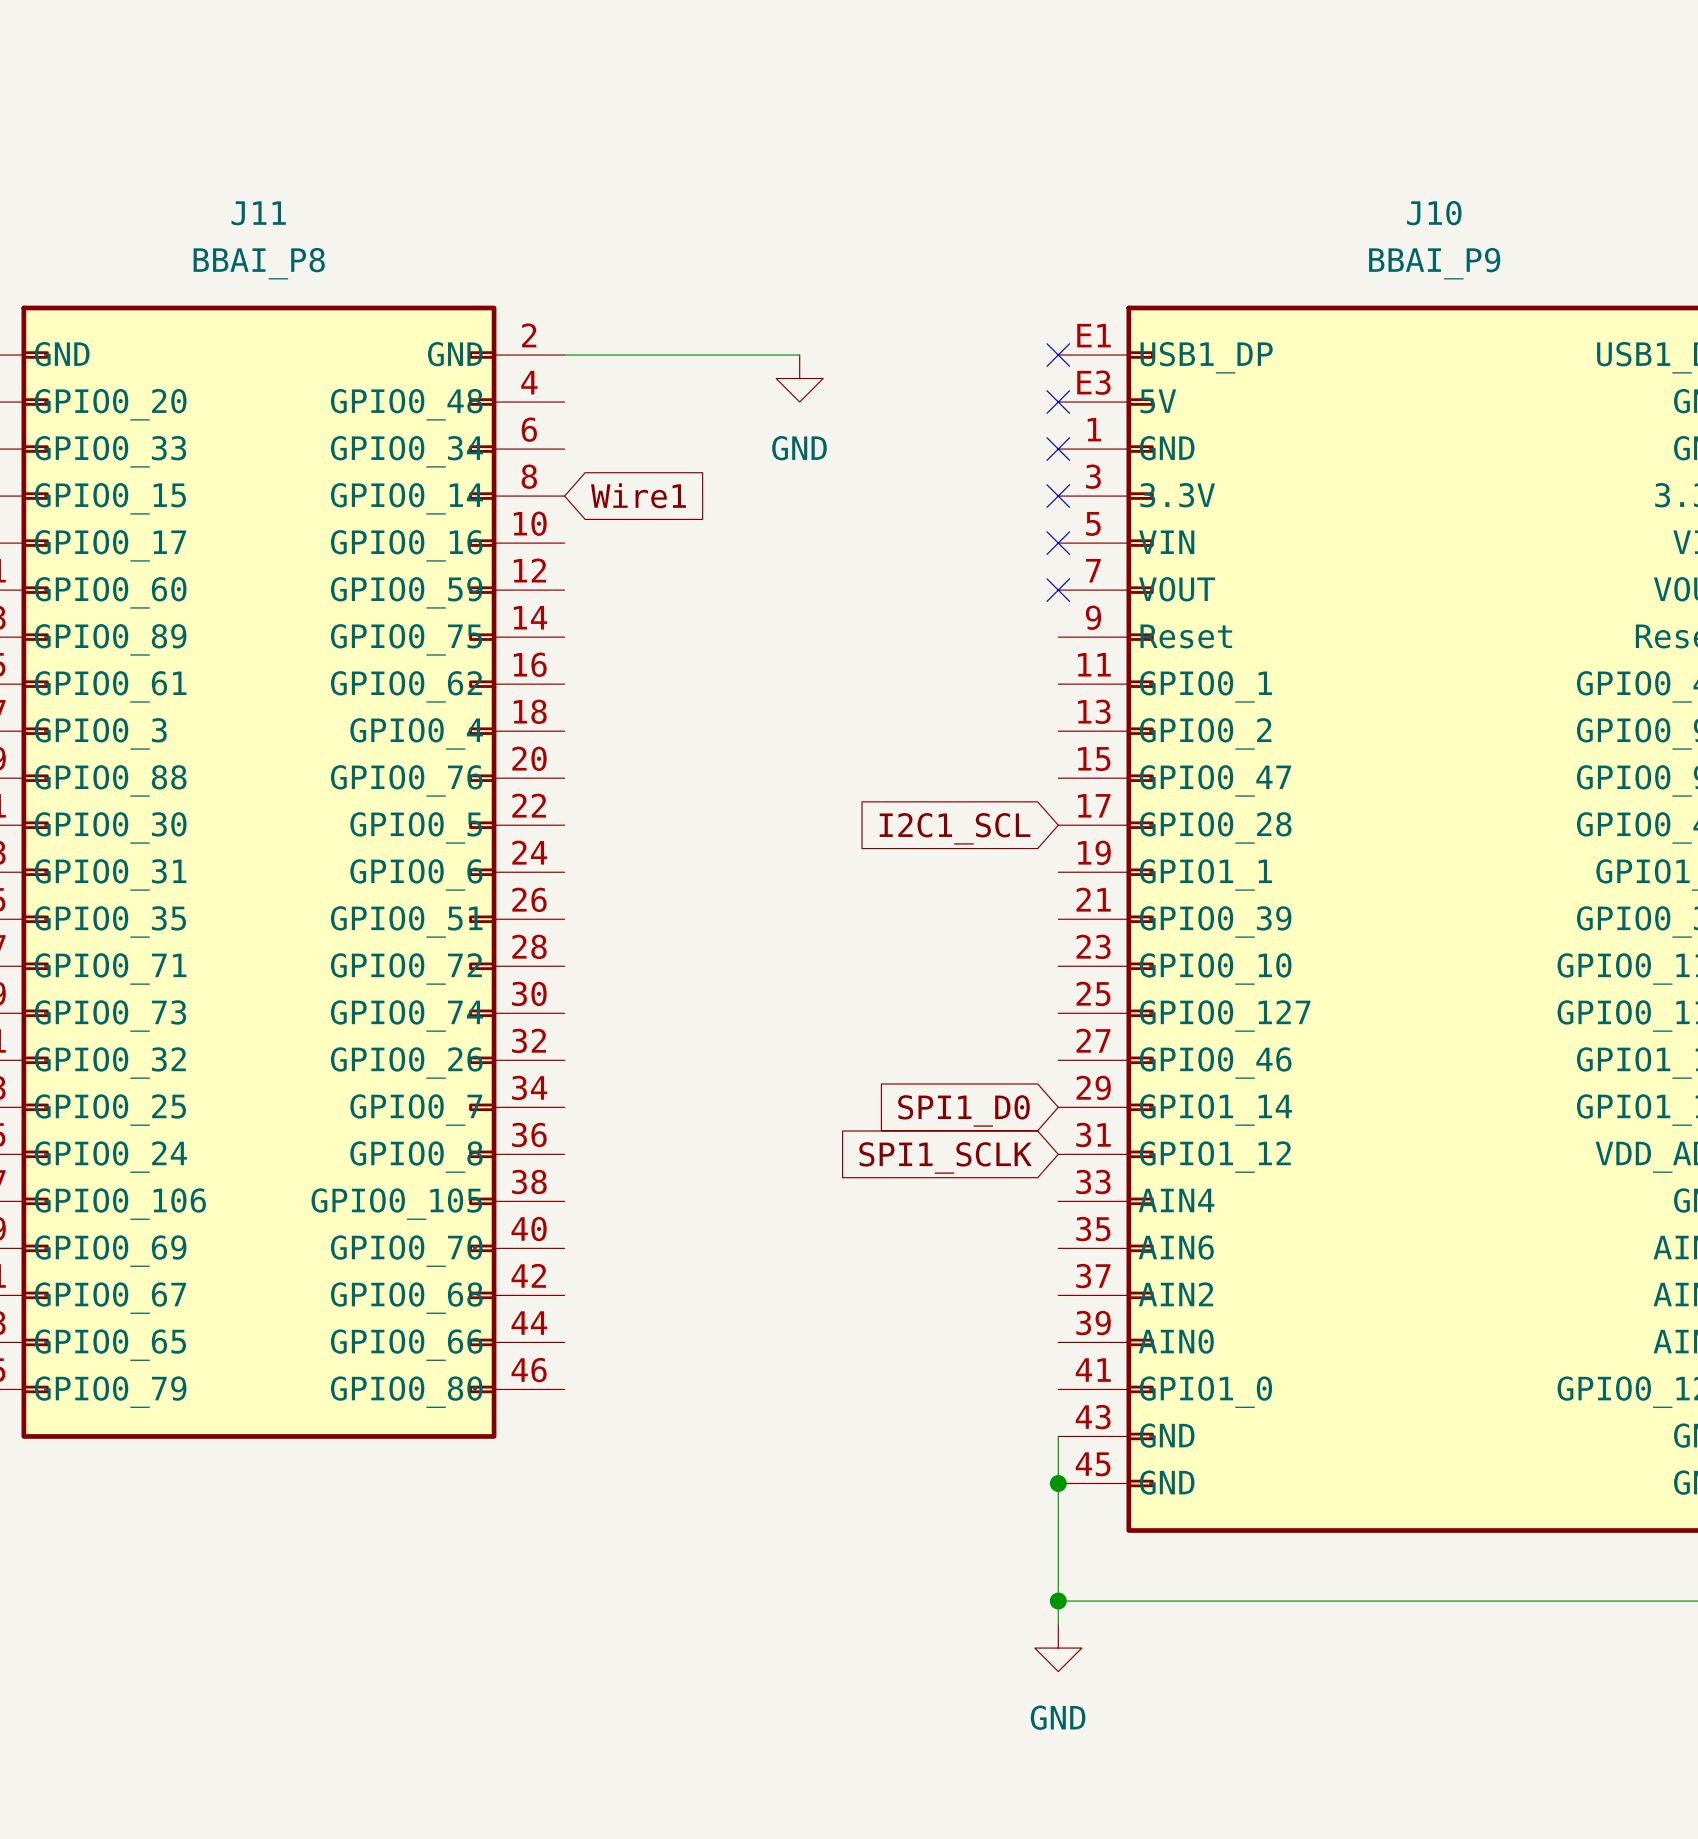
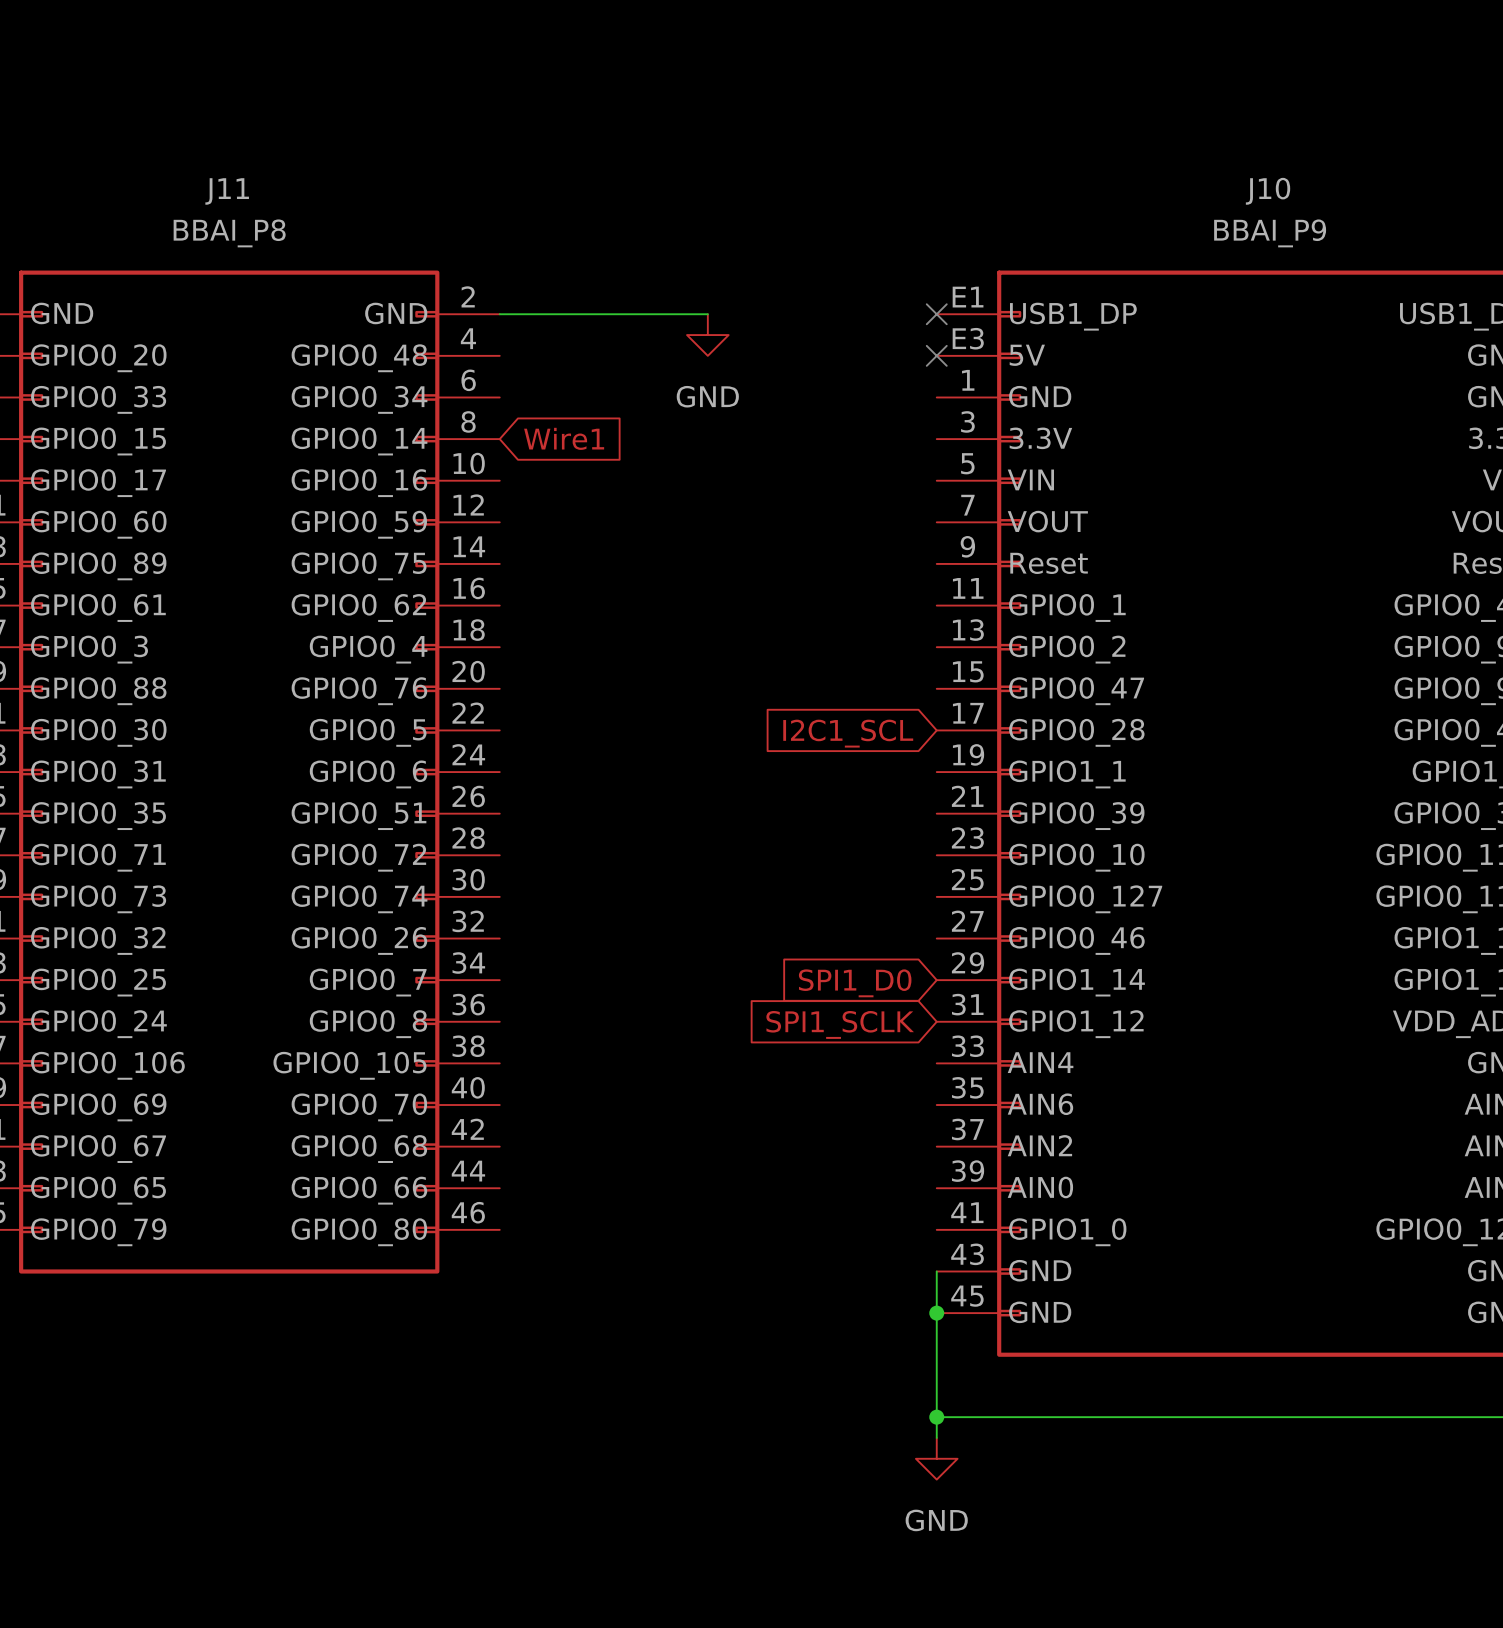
no-connect mark: (1058, 449) -> none
no-connect mark: (1058, 496) -> none
no-connect mark: (1058, 543) -> none
no-connect mark: (1058, 590) -> none

